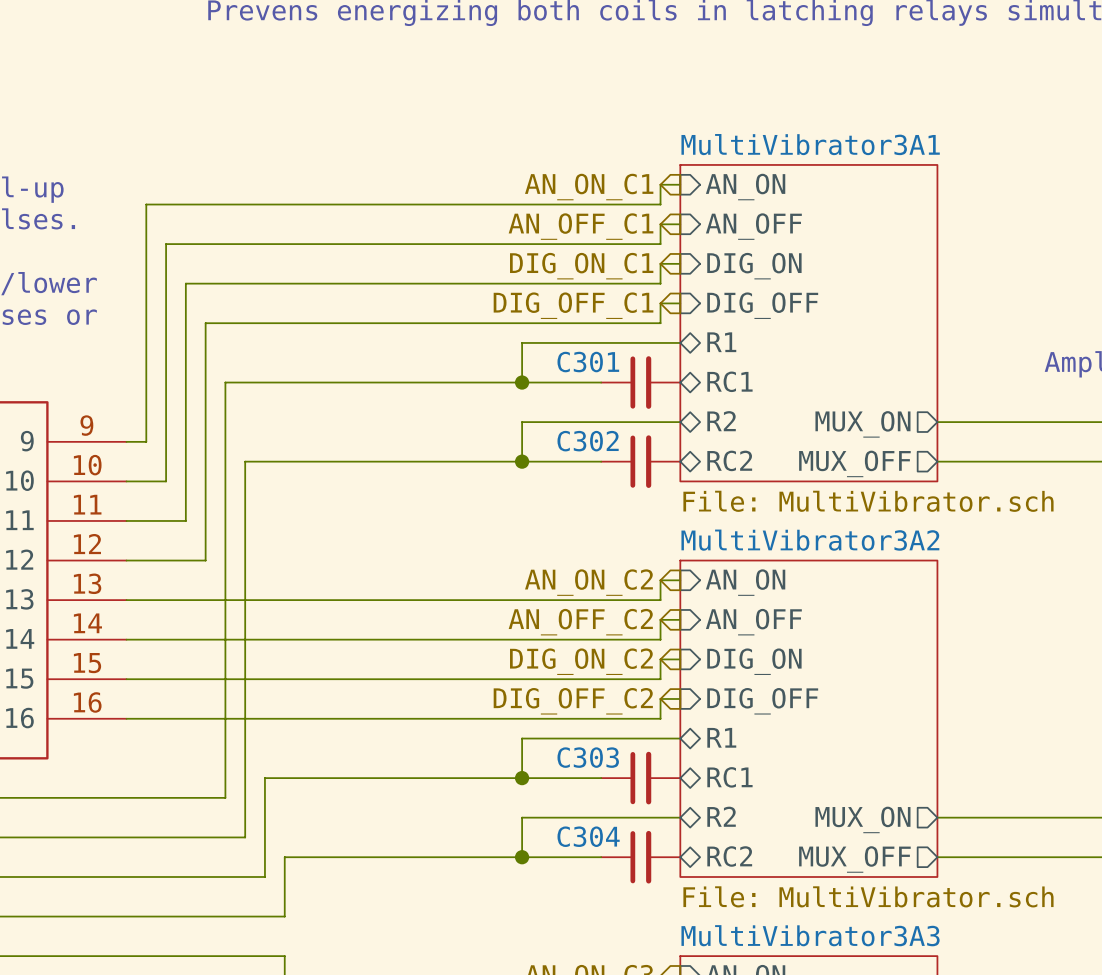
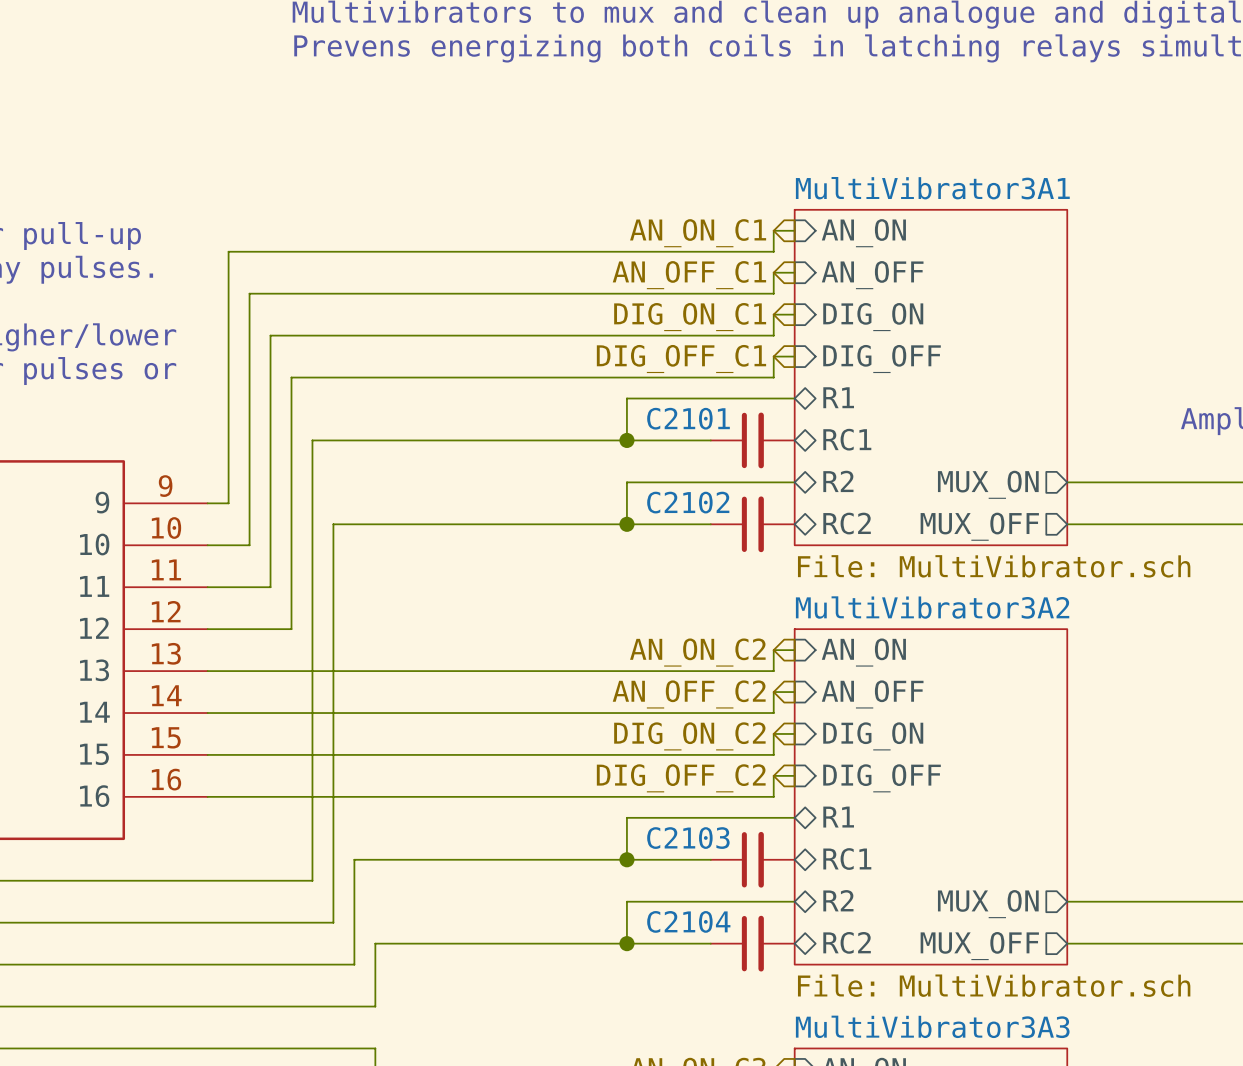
C301 name: C301 (588, 362) -> C2101 (688, 418)
C302 name: C302 (588, 441) -> C2102 (688, 502)
C303 name: C303 (588, 757) -> C2103 (688, 838)
C304 name: C304 (588, 836) -> C2104 (688, 921)

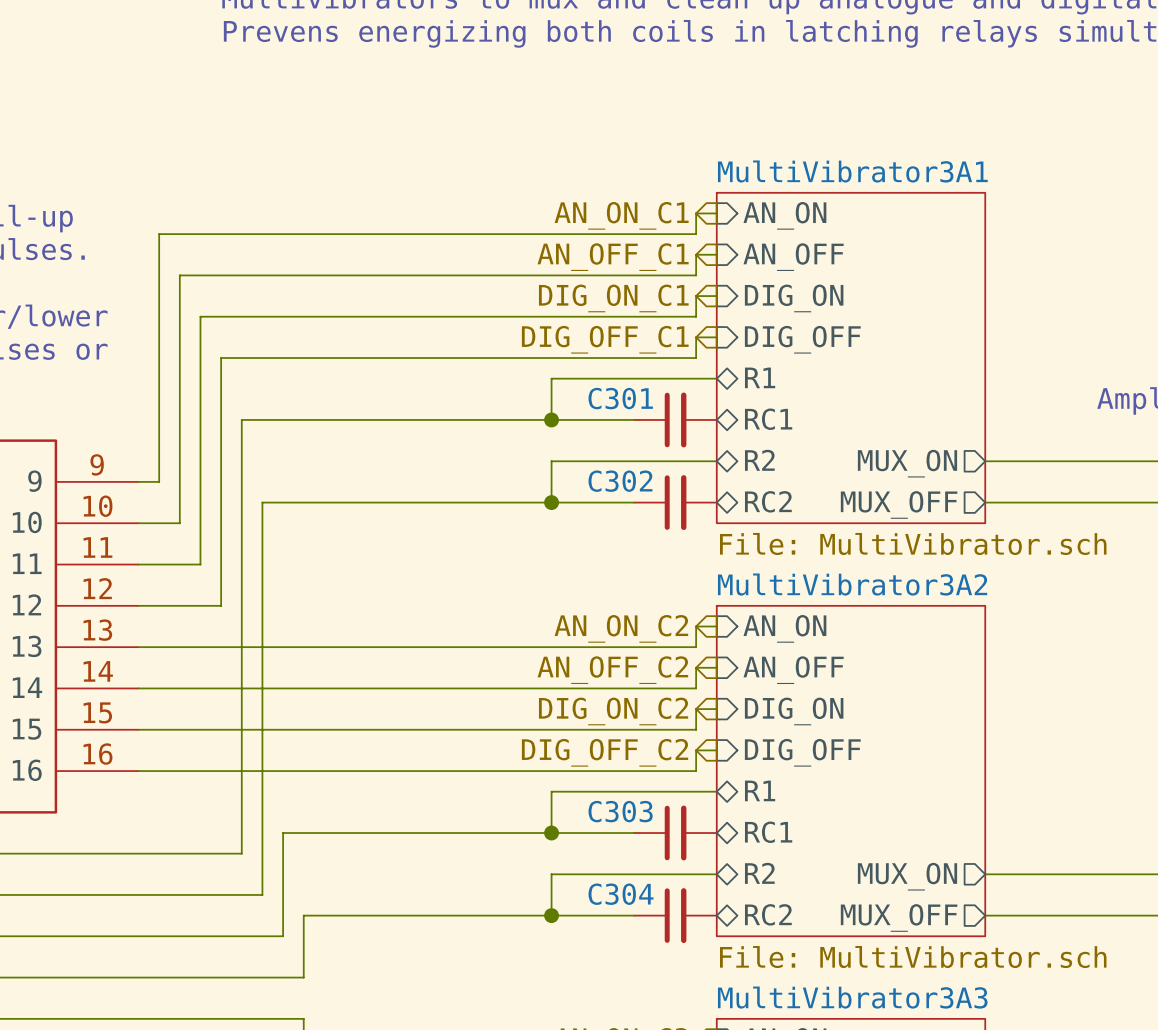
C2101 name: C2101 (688, 418) -> C301 (620, 398)
C2102 name: C2102 (688, 502) -> C302 (620, 481)
C2103 name: C2103 (688, 838) -> C303 (620, 811)
C2104 name: C2104 (688, 921) -> C304 (620, 894)

